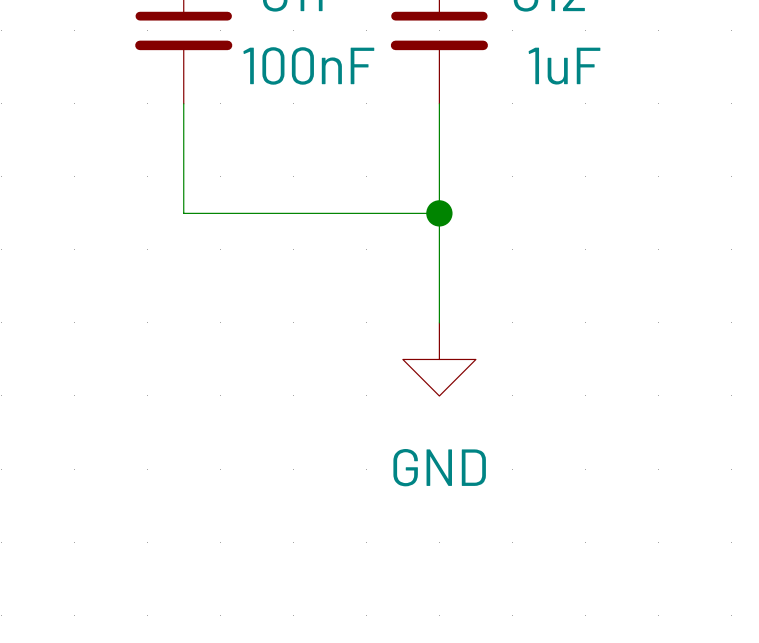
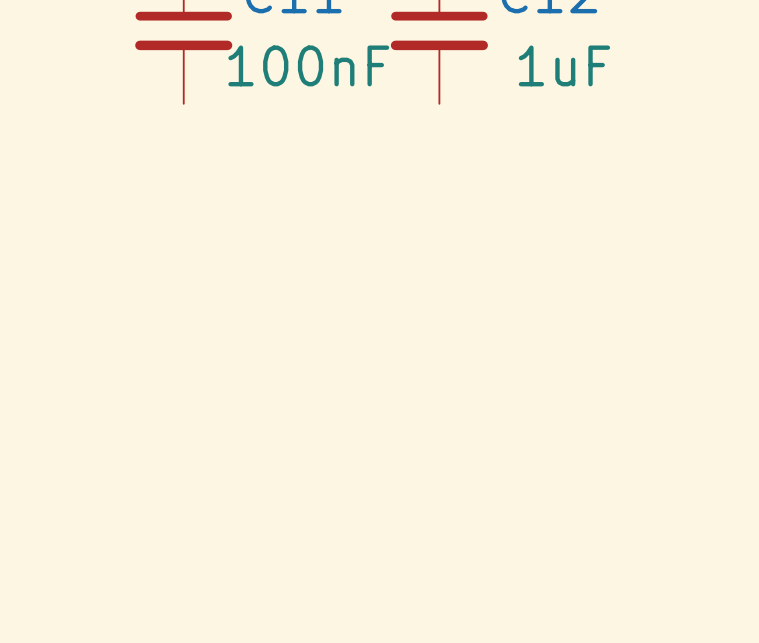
wire: (183, 103) (183, 213) (439, 213) -> none
wire: (439, 103) (439, 322) -> none
junction: (439, 213) -> none
power symbol: GND (439, 359) -> none

